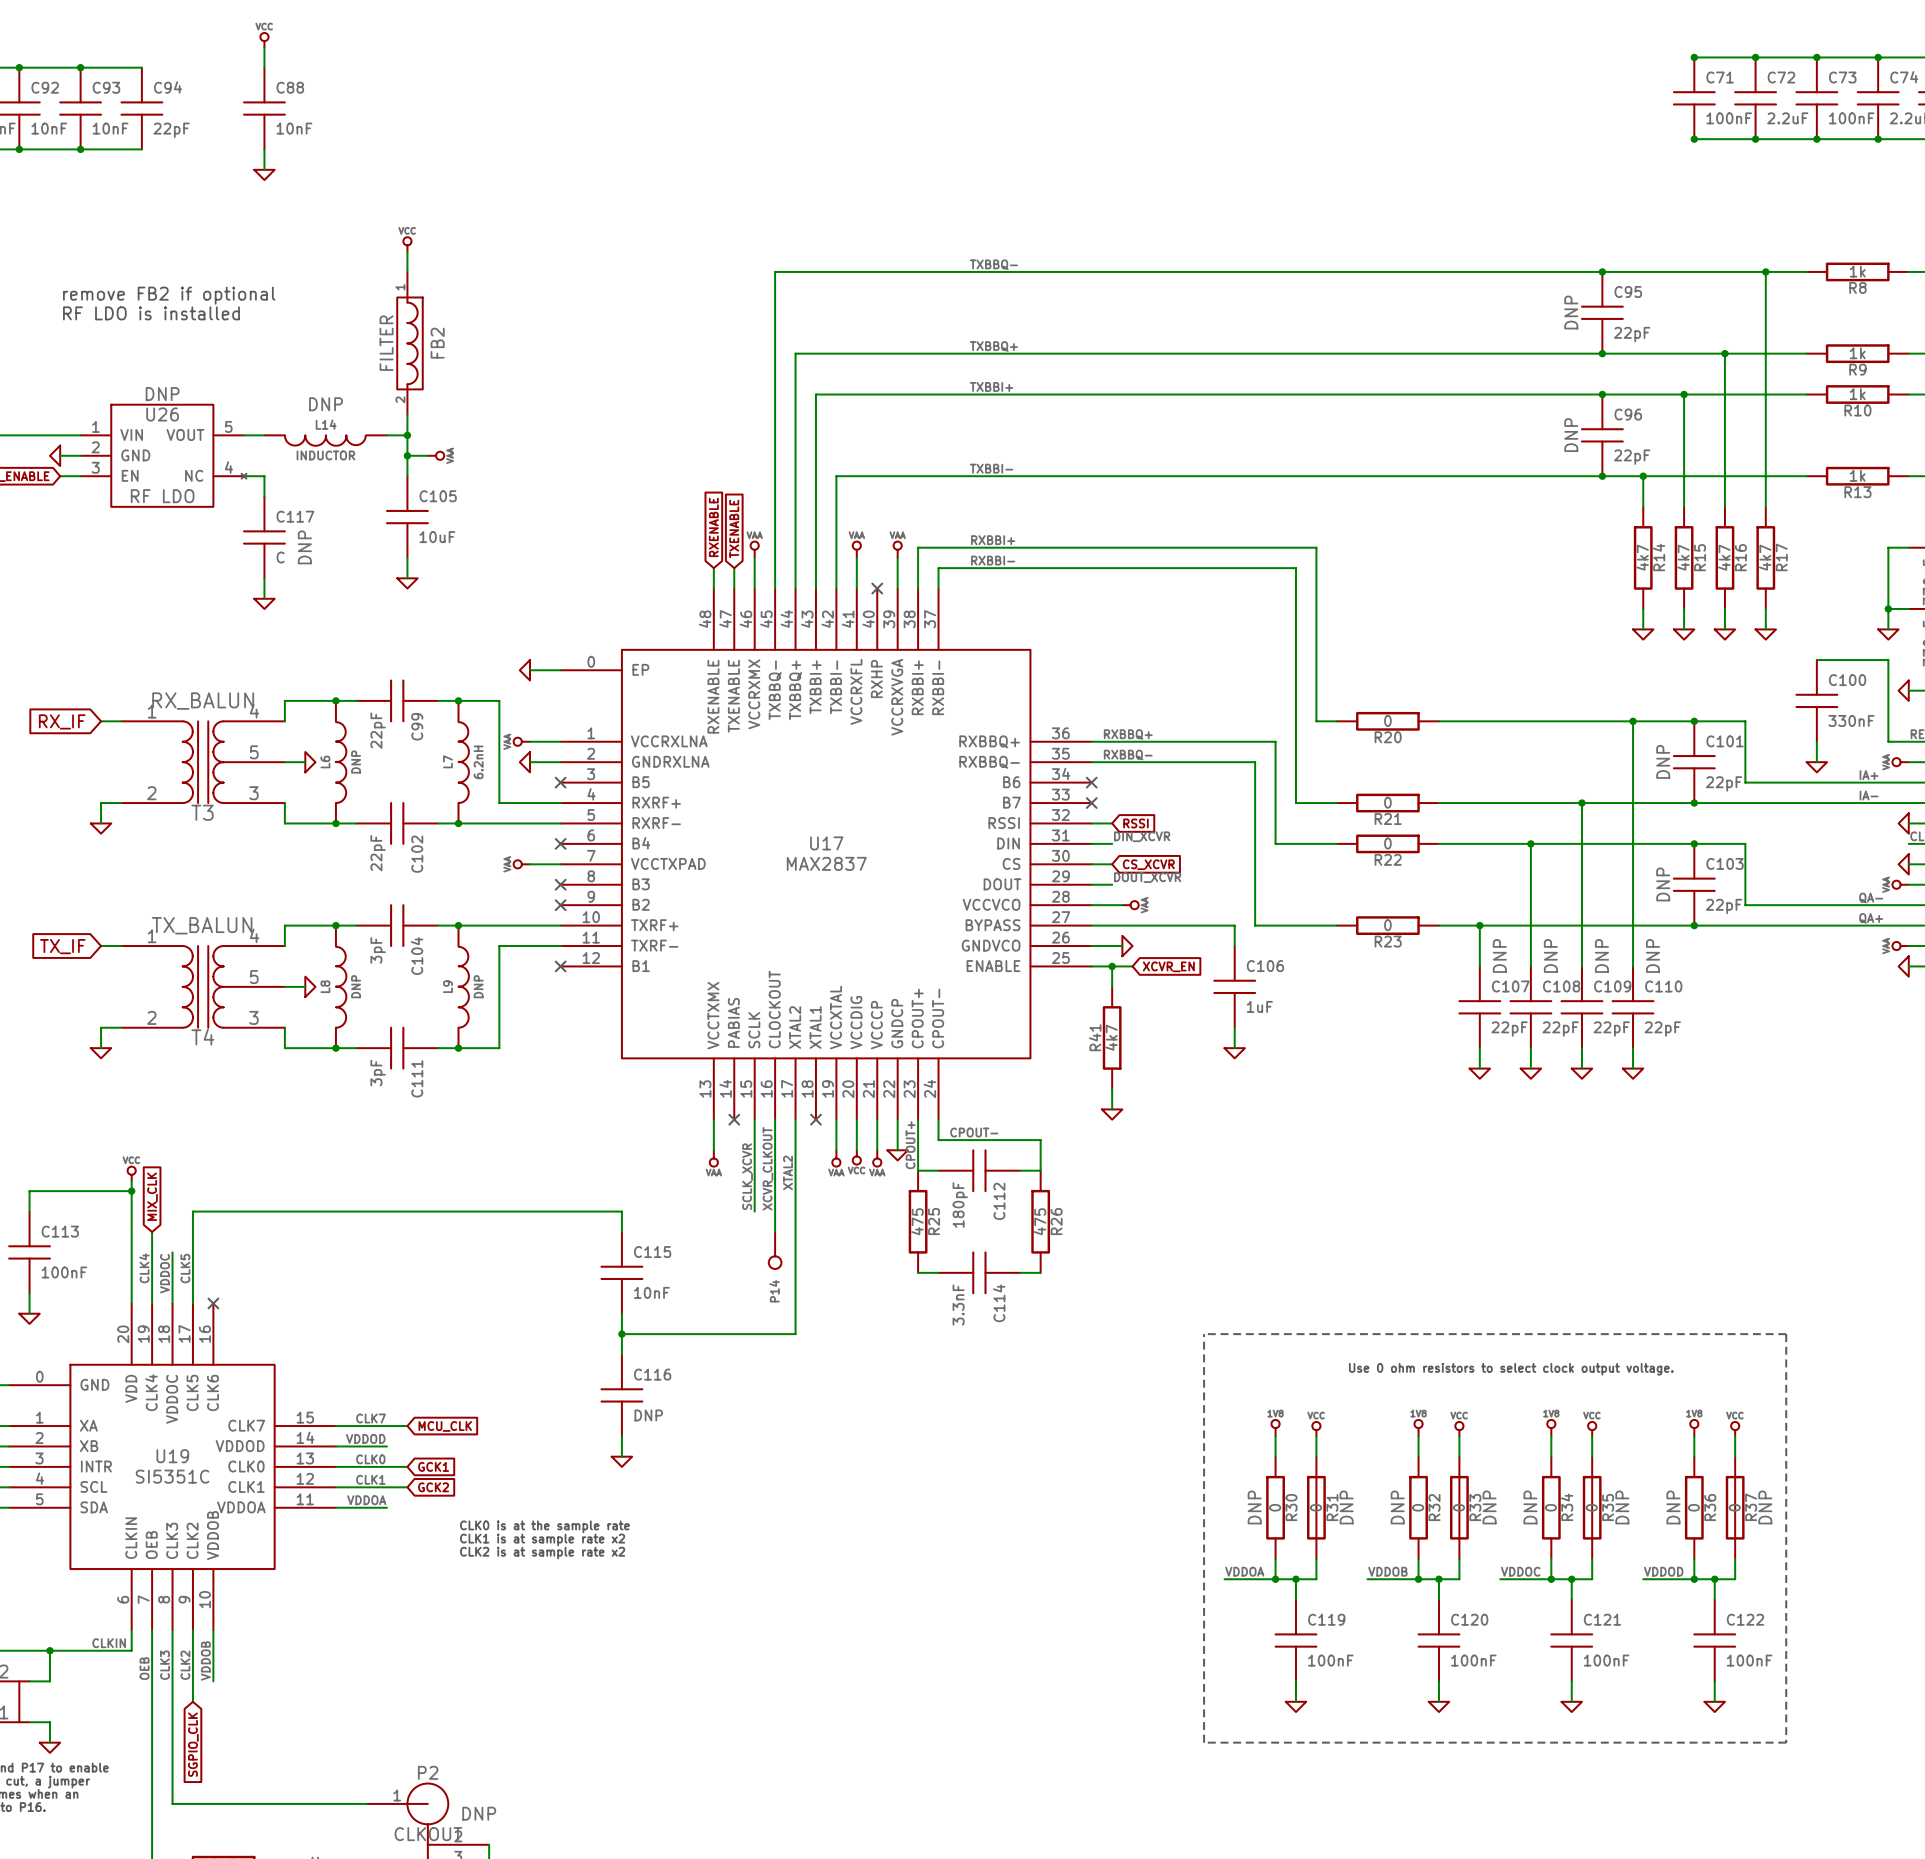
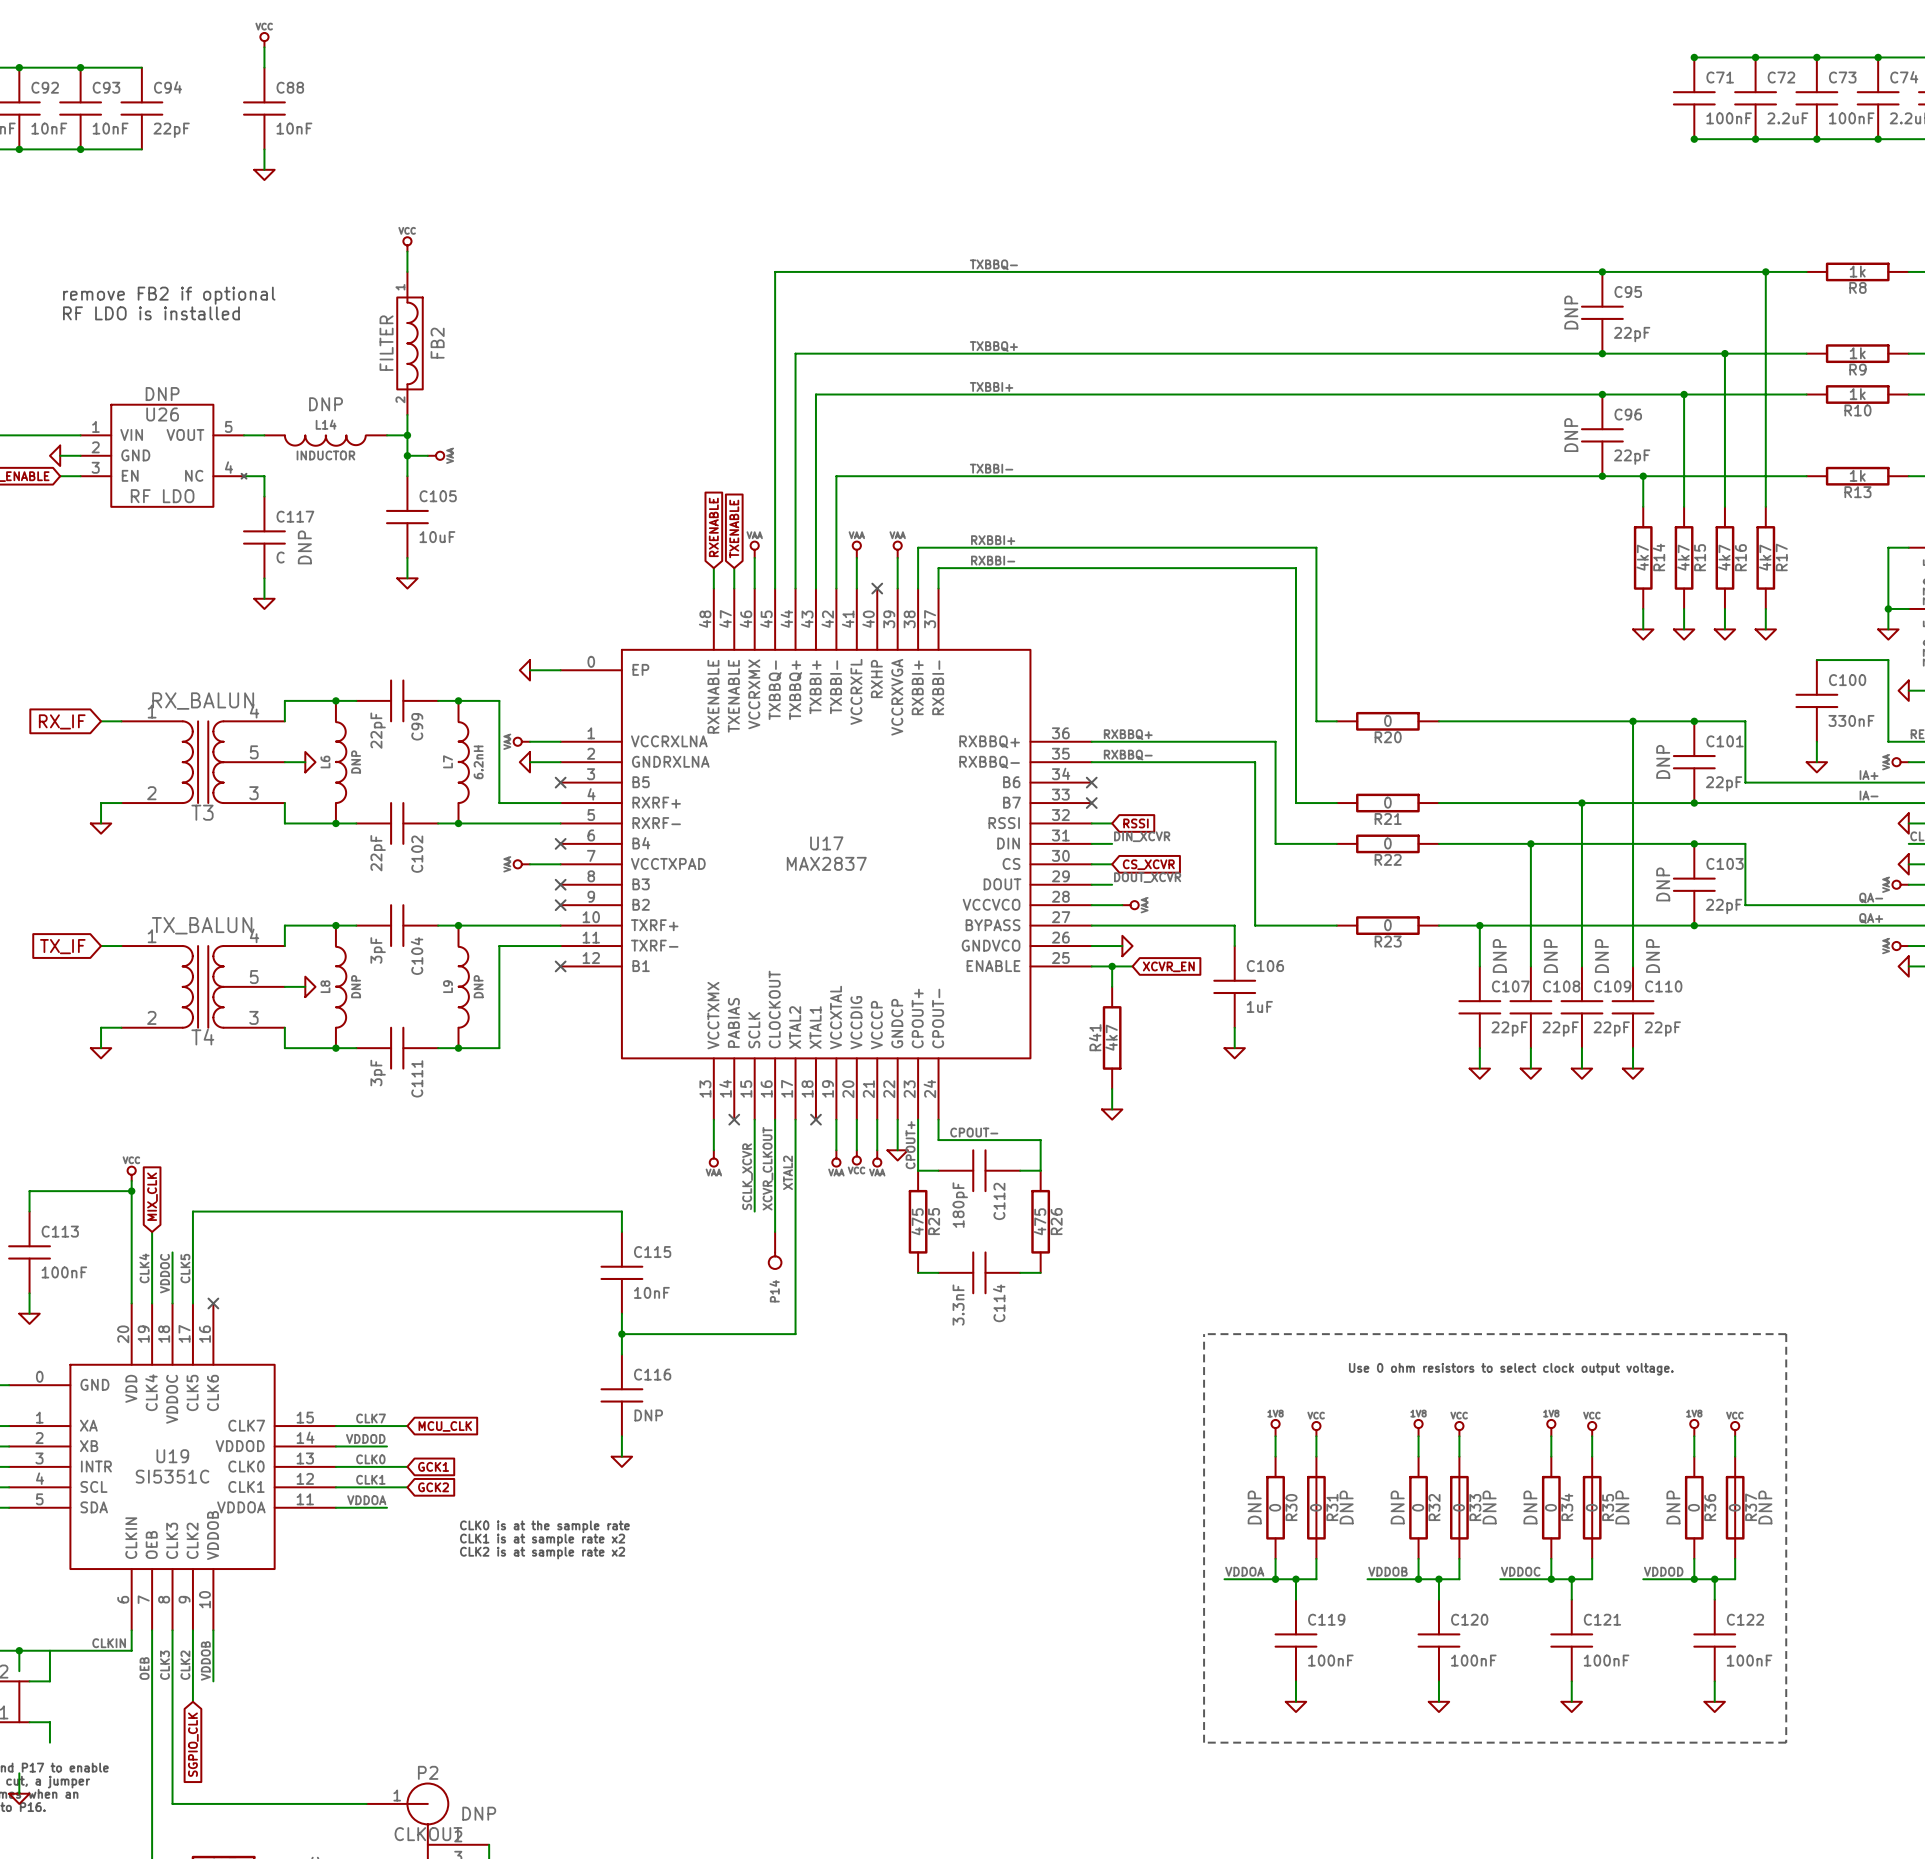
wire: none -> (19, 1650) (19, 1671)
junction position: (49, 1650) -> (19, 1650)
power symbol: (49, 1747) -> none
wire: none -> (19, 1773) (19, 1793)
power symbol: none -> (19, 1798)

